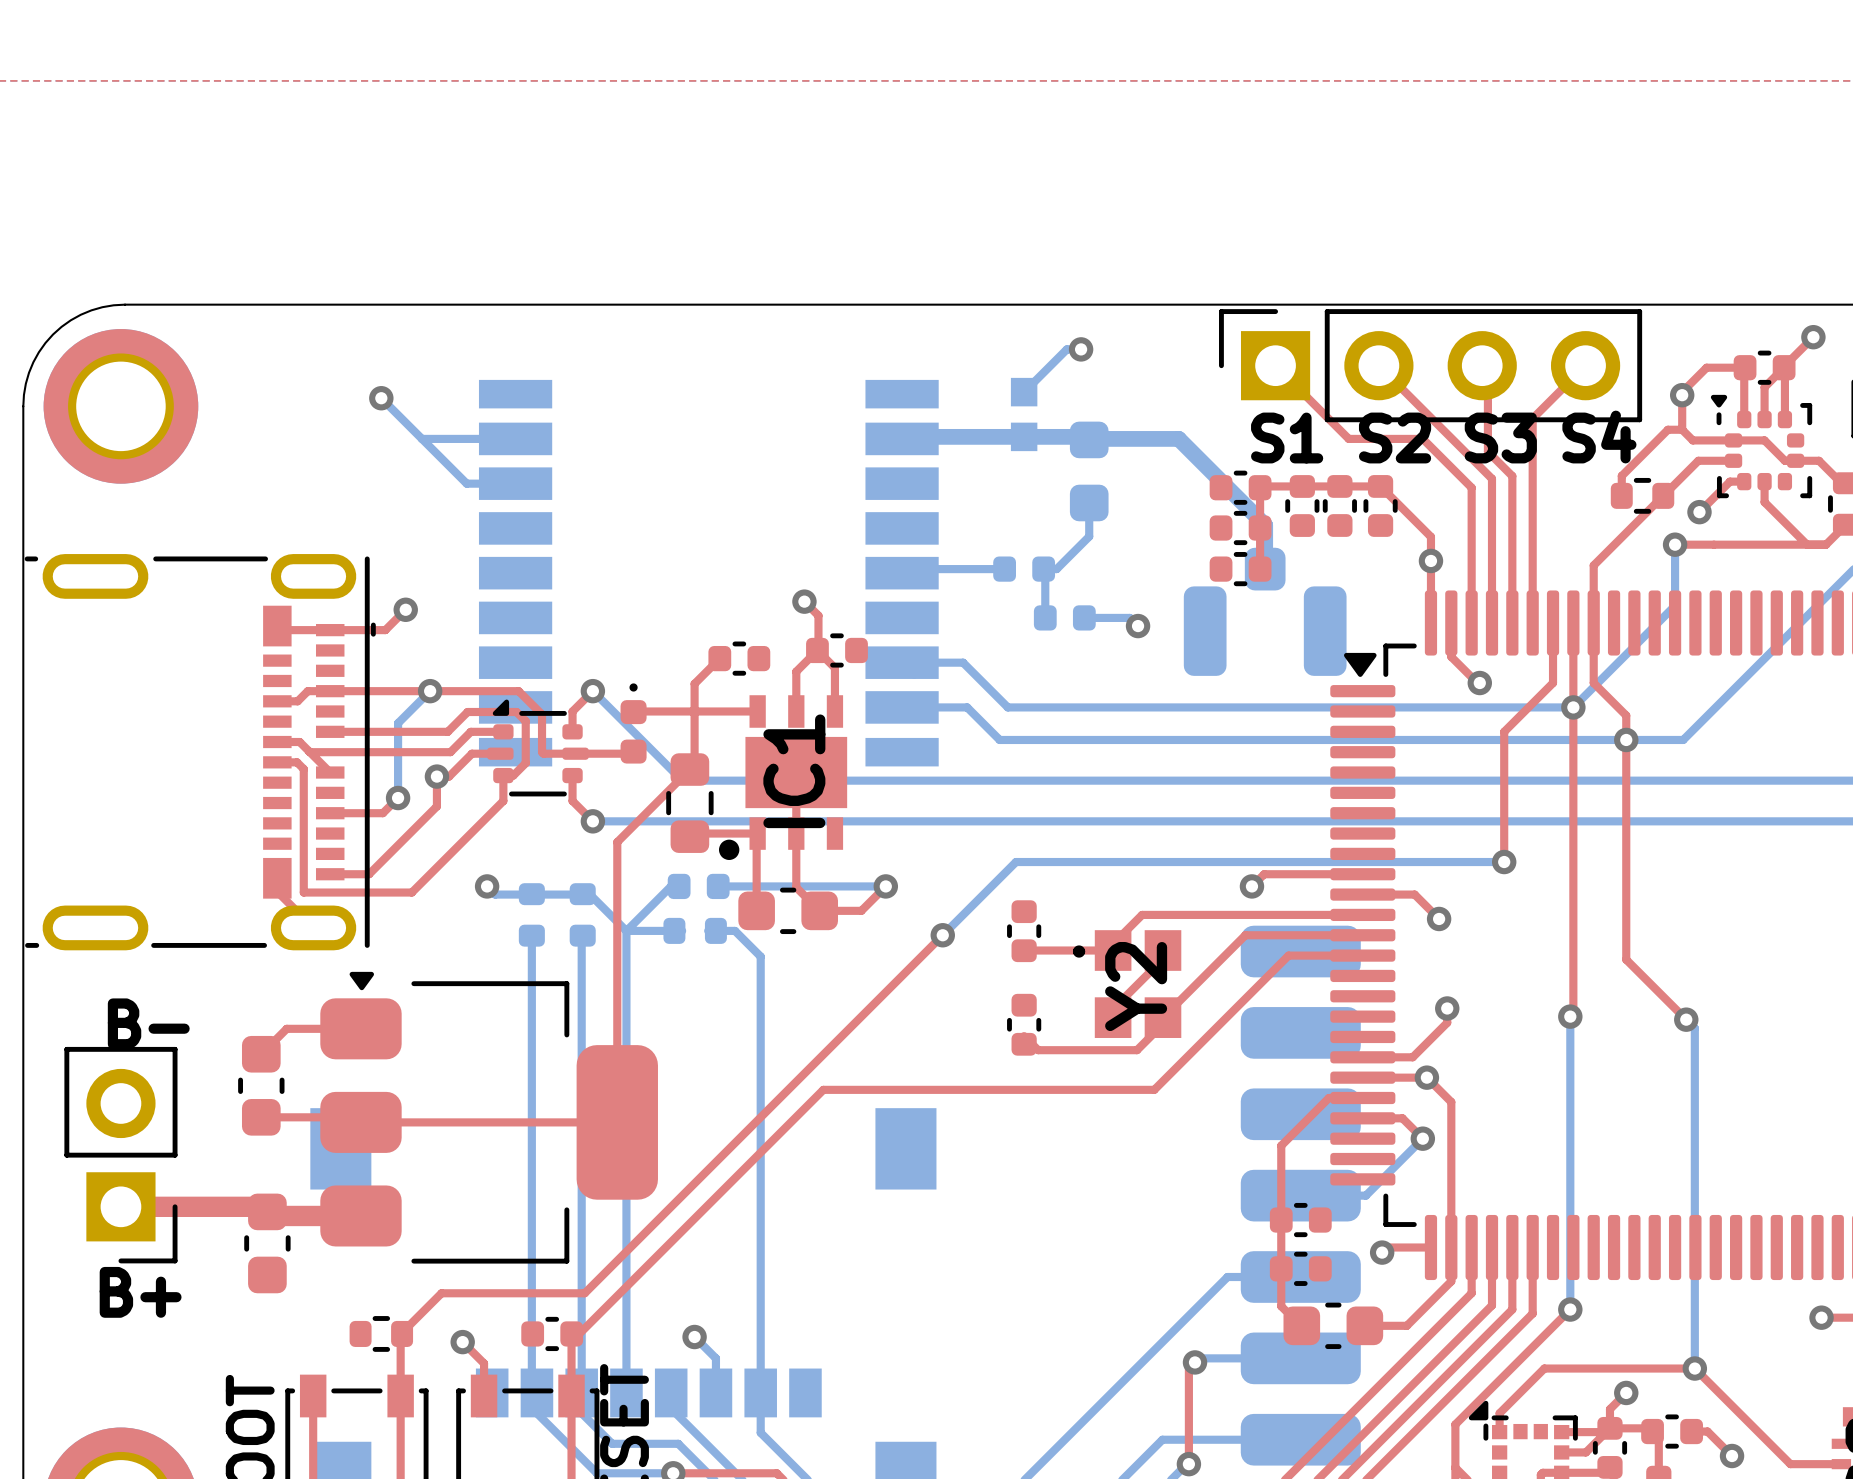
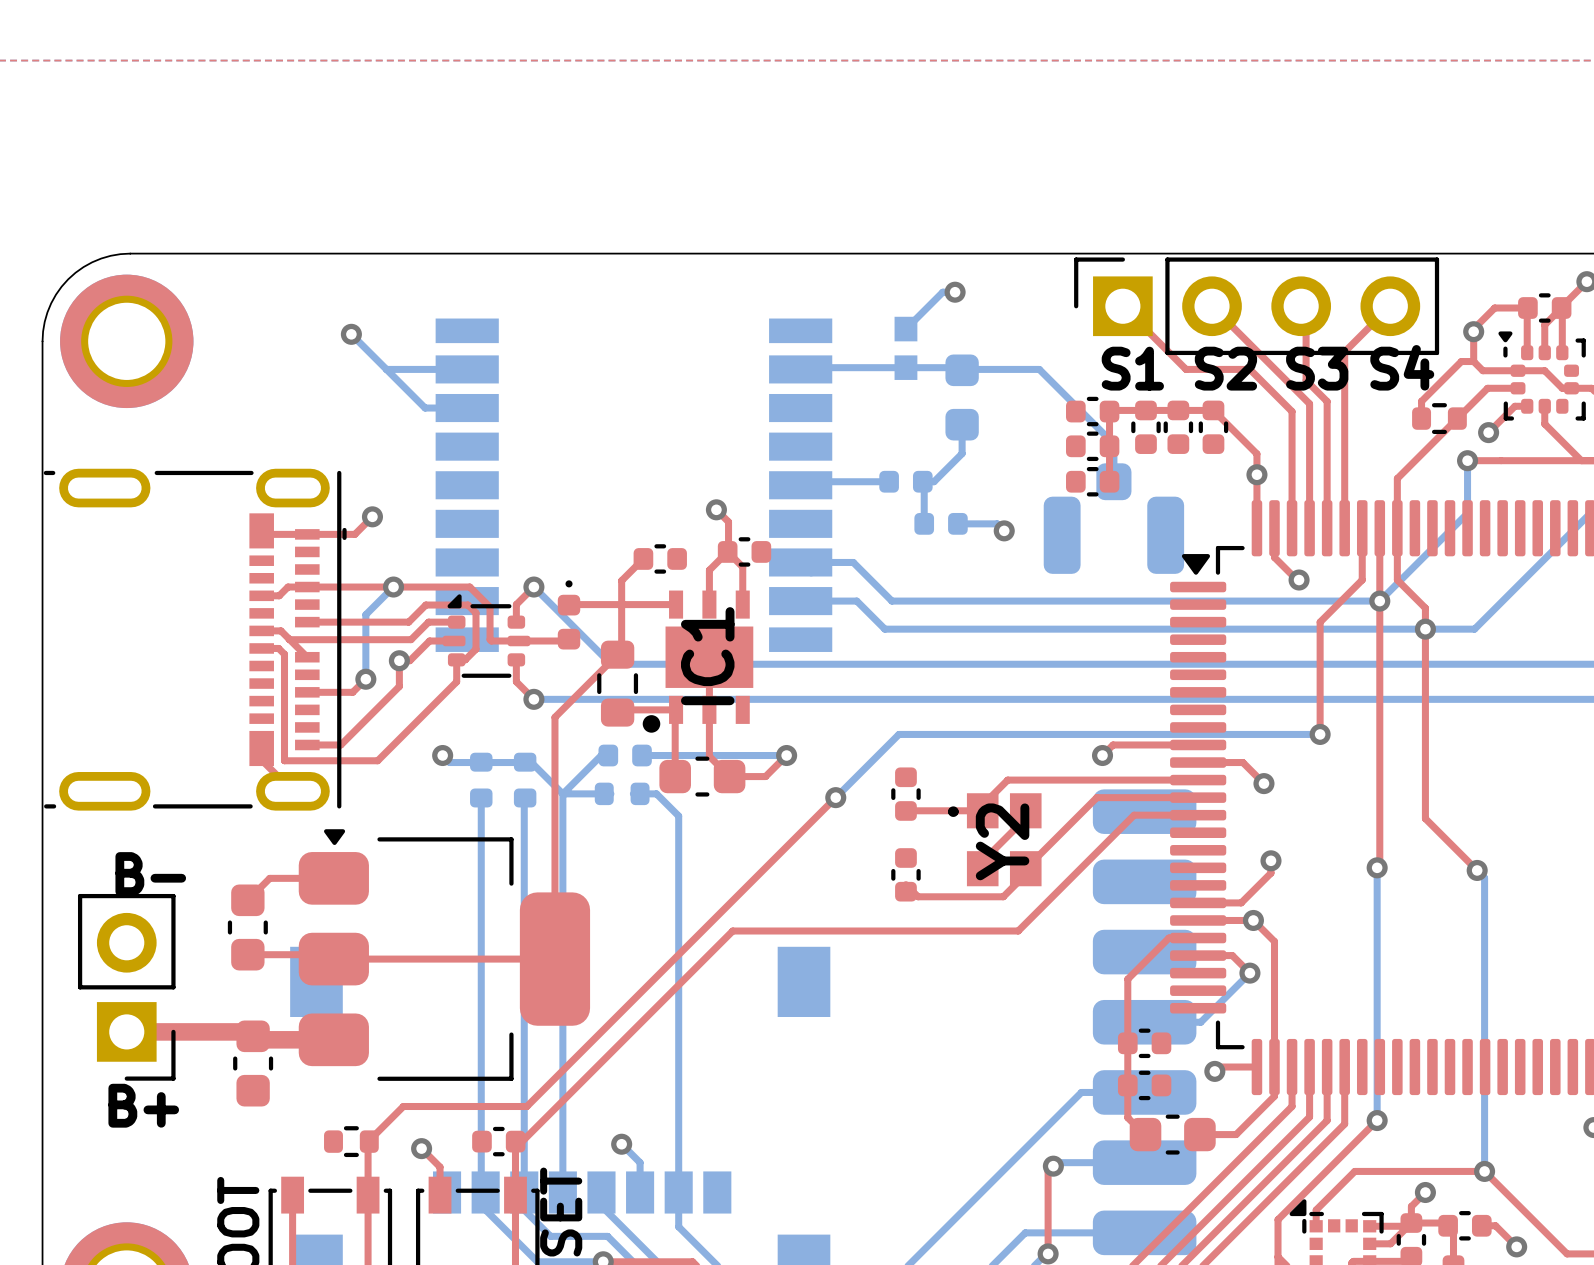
bottom track width: thick (904, 436) (1086, 436) -> thin (802, 367) (959, 367)
bottom track width: thick (1090, 438) (1178, 438) (1265, 525) (1265, 569) -> thin (963, 369) (1039, 369) (1113, 444) (1113, 481)

